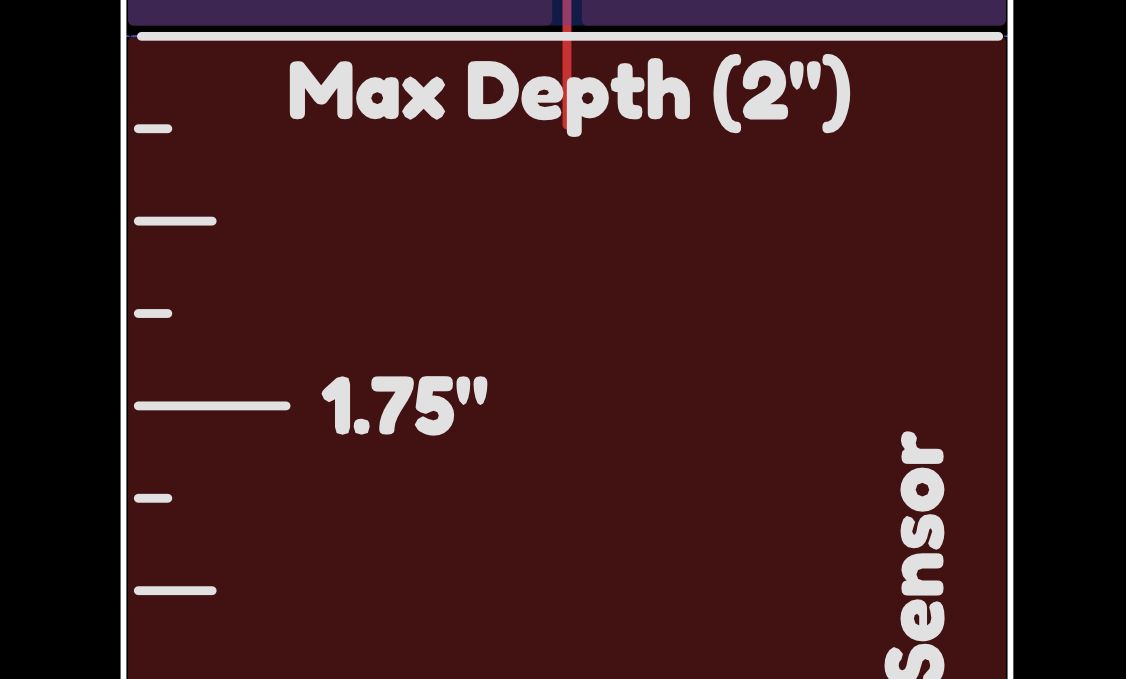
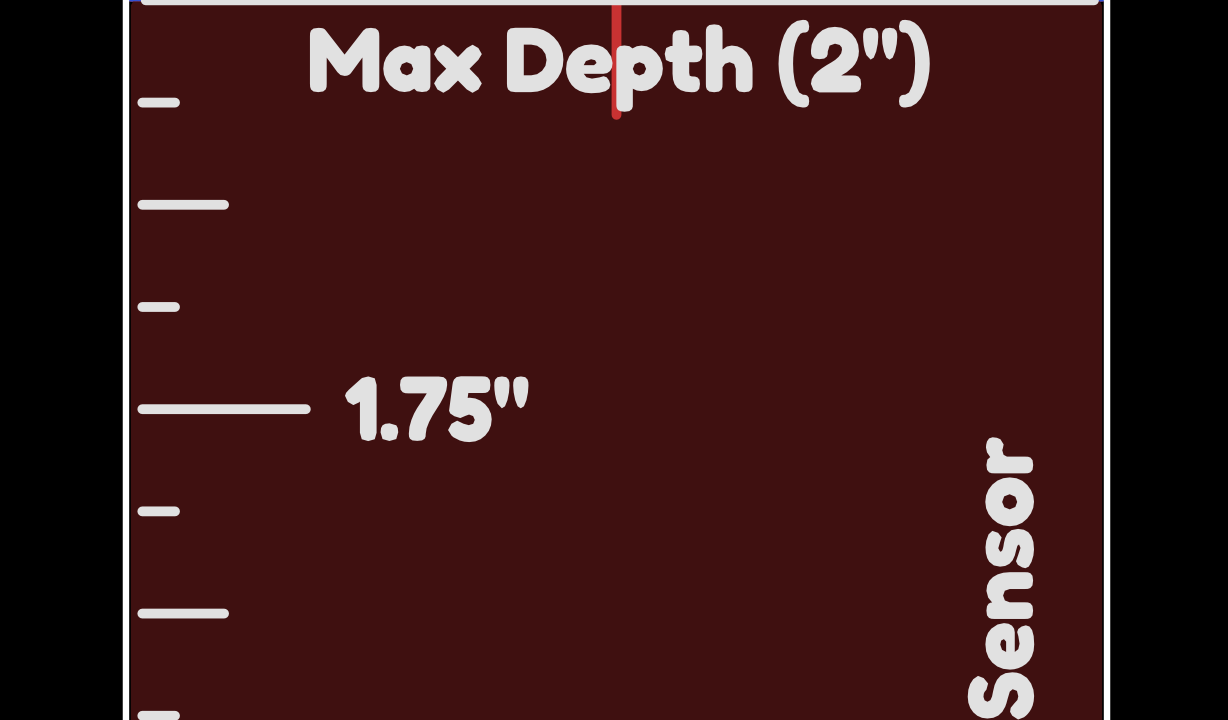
top track: none -> (616, 98) (616, 114)

